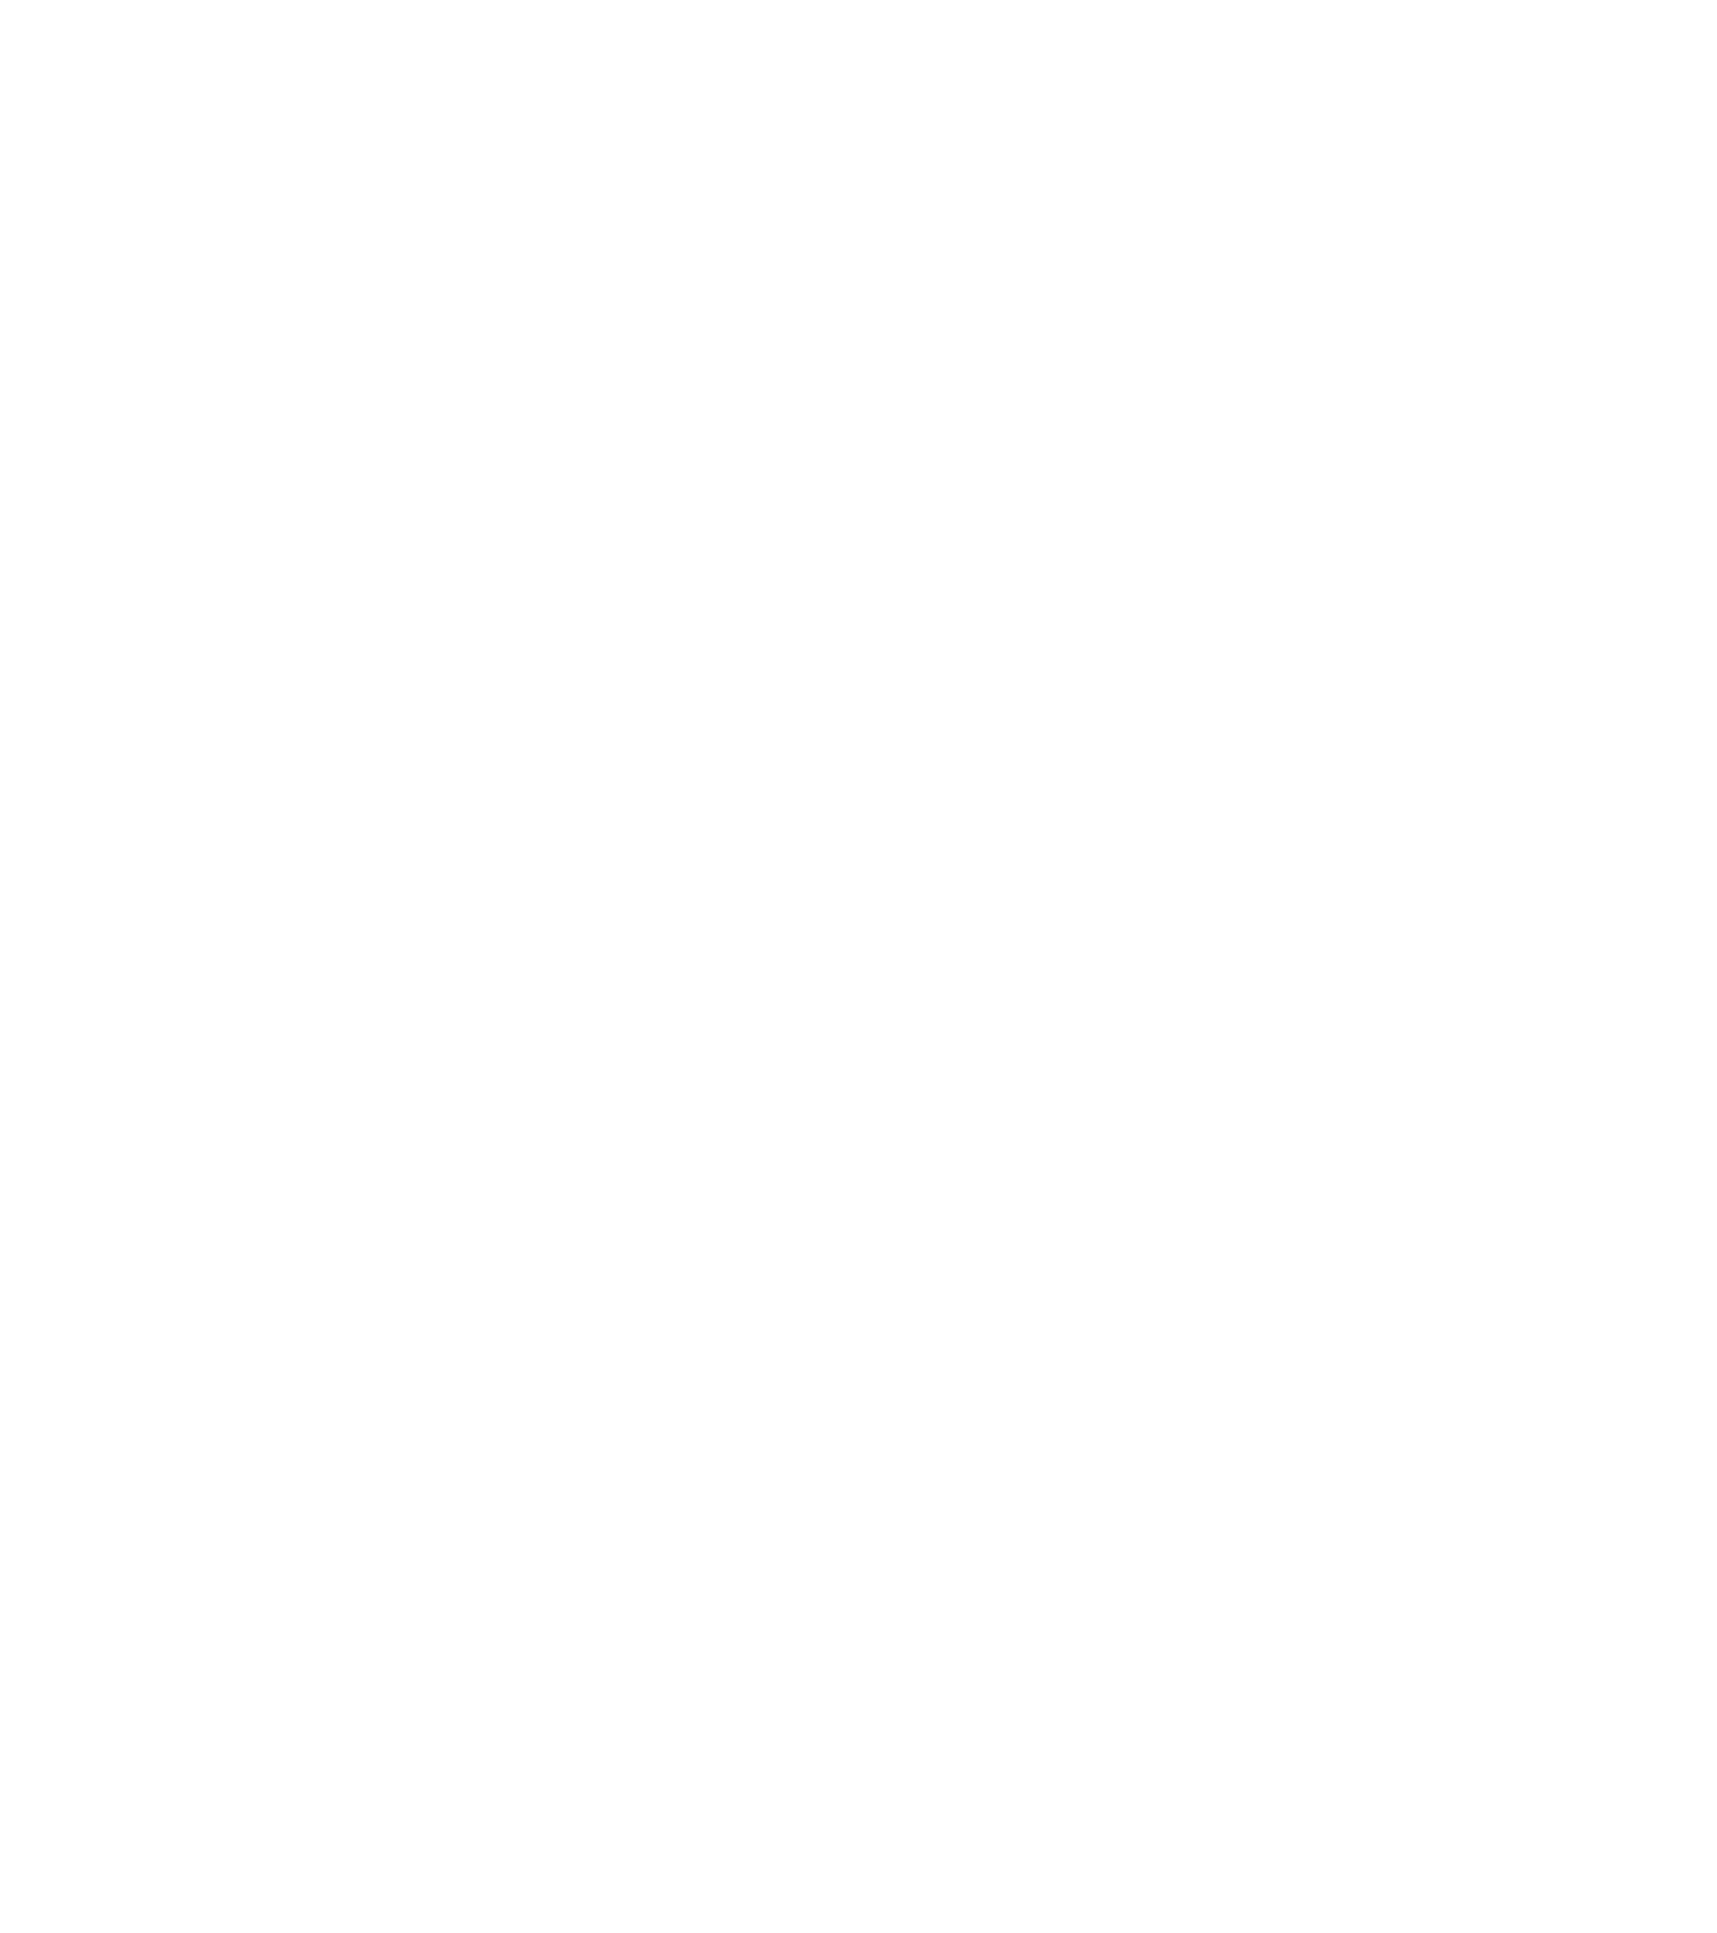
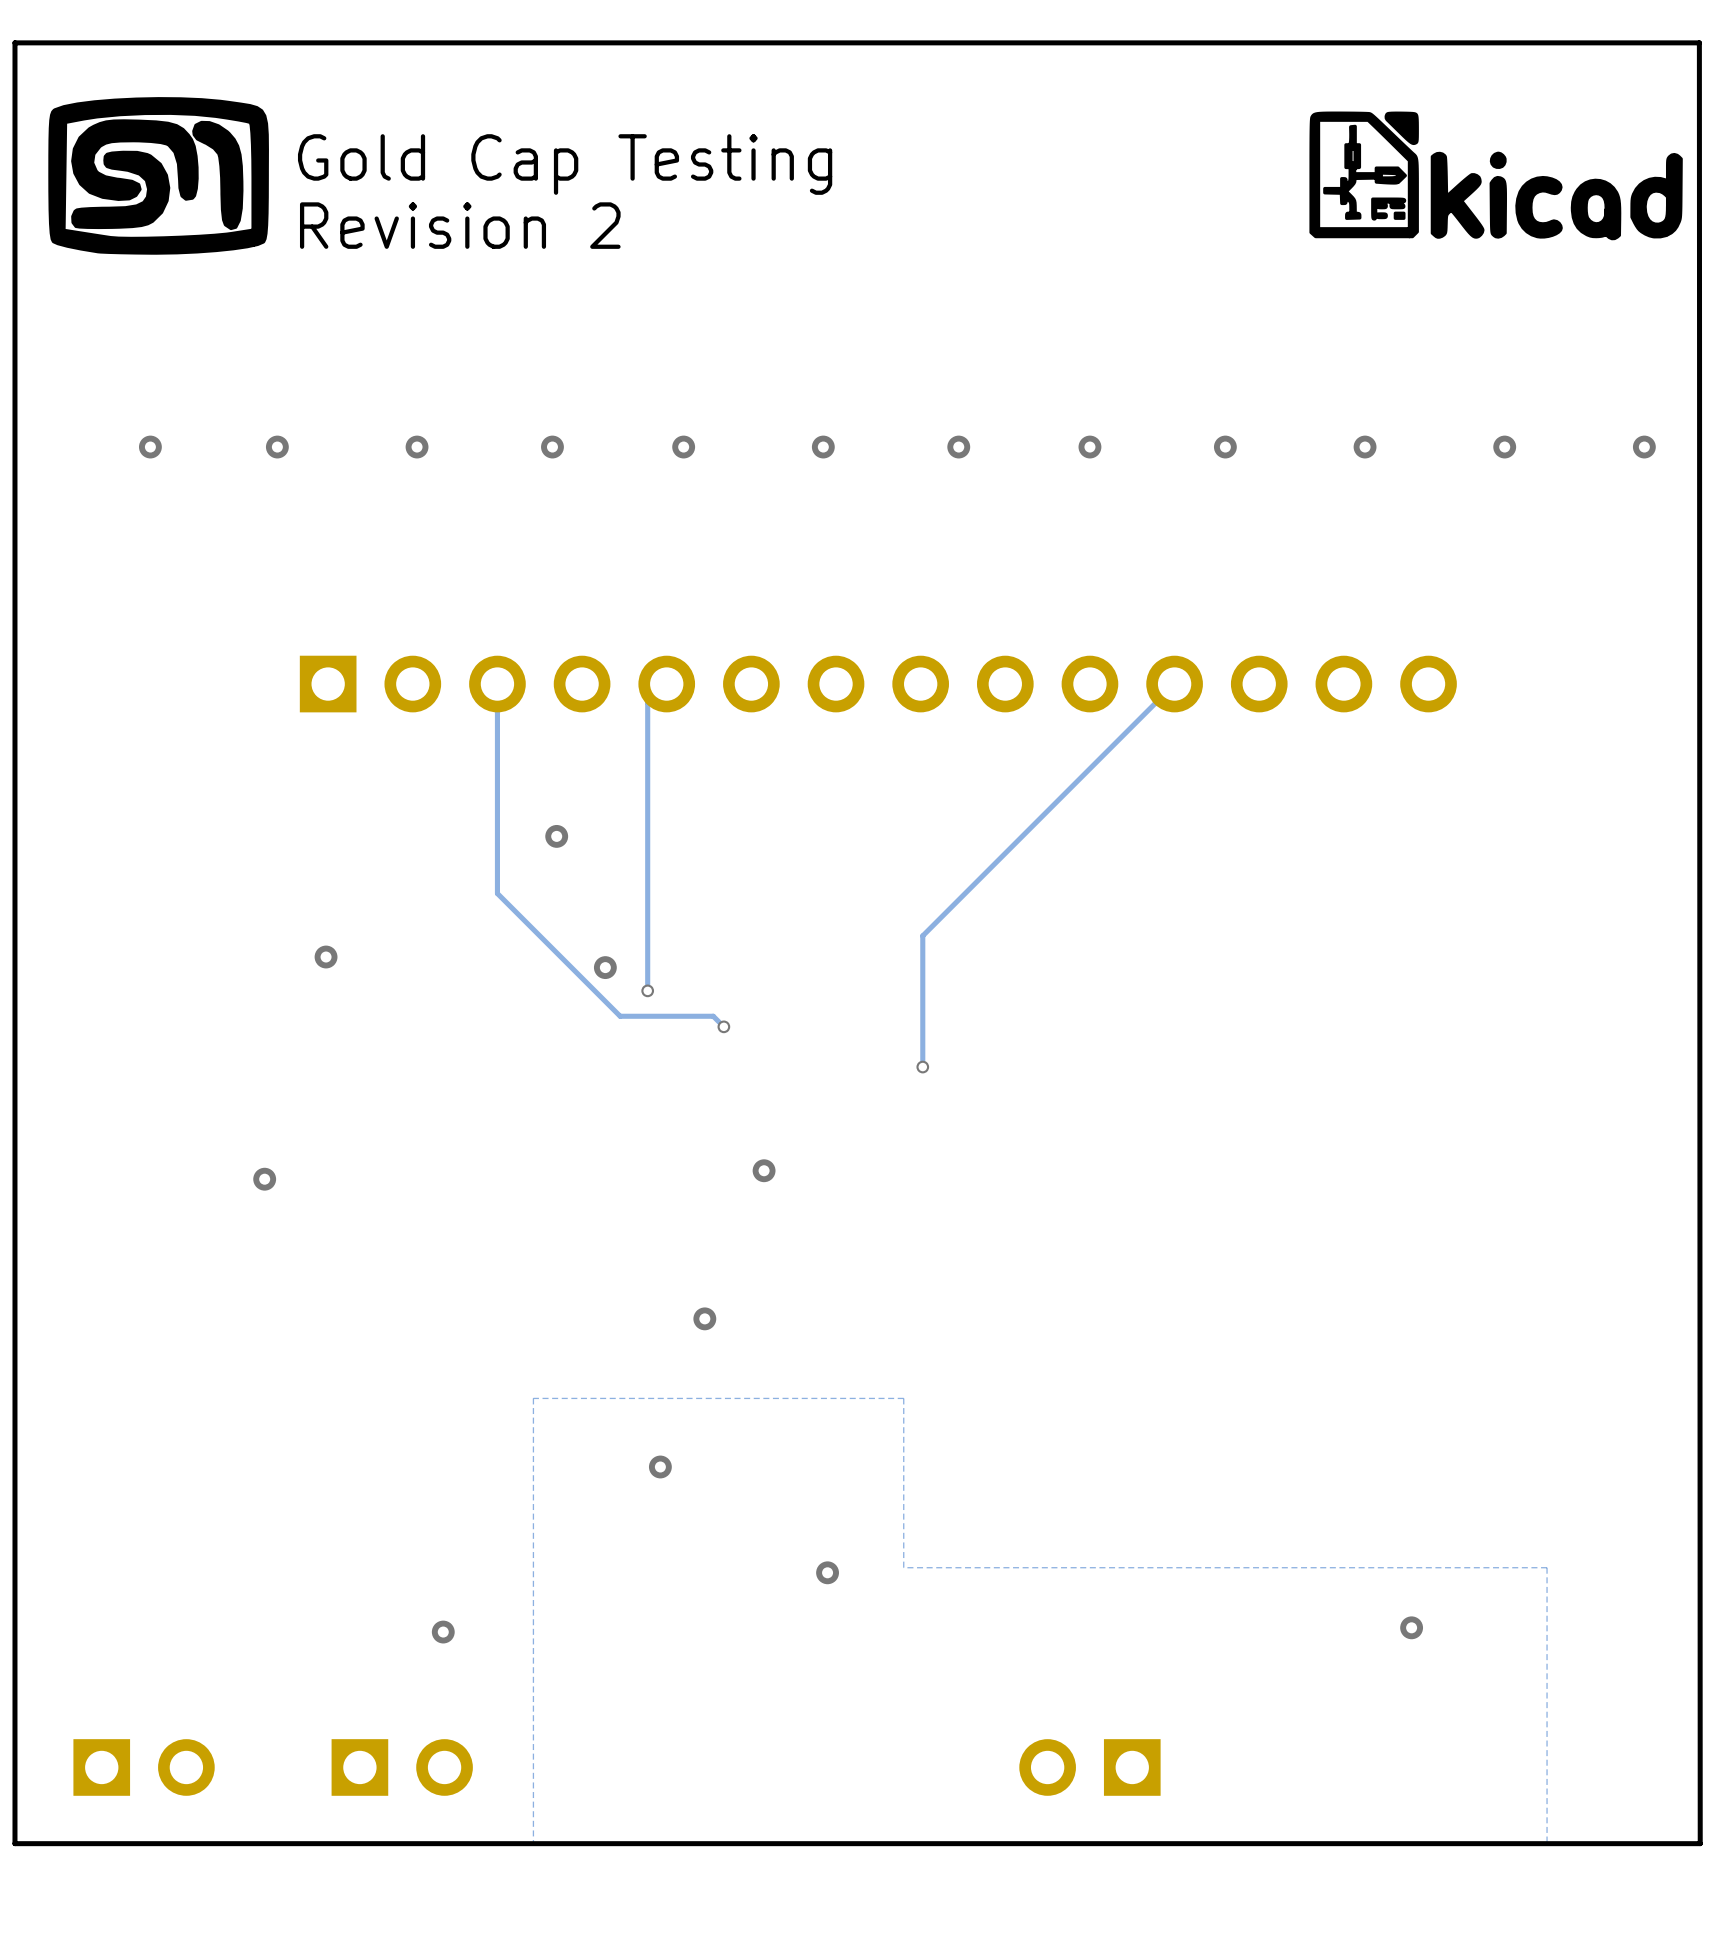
board edge: none -> (1699, 42) (1700, 1843) (14, 1843) (14, 42) (1699, 42)
drawing: none -> [48, 97, 269, 255]
drawing: none -> [1309, 111, 1683, 241]
text: none -> Gold Cap Testing (565, 164)
text: none -> Revision 2 (460, 225)
via: none -> (150, 447)
via: none -> (277, 447)
via: none -> (417, 447)
via: none -> (552, 447)
via: none -> (683, 447)
via: none -> (823, 447)
via: none -> (958, 447)
via: none -> (1089, 447)
via: none -> (1225, 447)
via: none -> (1365, 447)
via: none -> (1504, 447)
via: none -> (1644, 447)
track: none -> (497, 684) (497, 893) (620, 1016) (713, 1016) (723, 1026)
track: none -> (666, 684) (647, 703) (647, 990)
part: none -> (878, 684)
track: none -> (1174, 684) (922, 935) (922, 1067)
via: none -> (556, 836)
via: none -> (326, 957)
via: none -> (605, 967)
via: none -> (647, 990)
via: none -> (723, 1026)
via: none -> (922, 1067)
via: none -> (764, 1170)
via: none -> (264, 1179)
via: none -> (704, 1318)
zone outline: none -> (903, 1398) (903, 1567) (1547, 1567) (1547, 1843) (533, 1843) (533, 1398) (903, 1398)
via: none -> (660, 1466)
via: none -> (827, 1572)
via: none -> (1411, 1627)
via: none -> (443, 1632)
part: none -> (144, 1767)
part: none -> (402, 1767)
part: none -> (1089, 1767)

